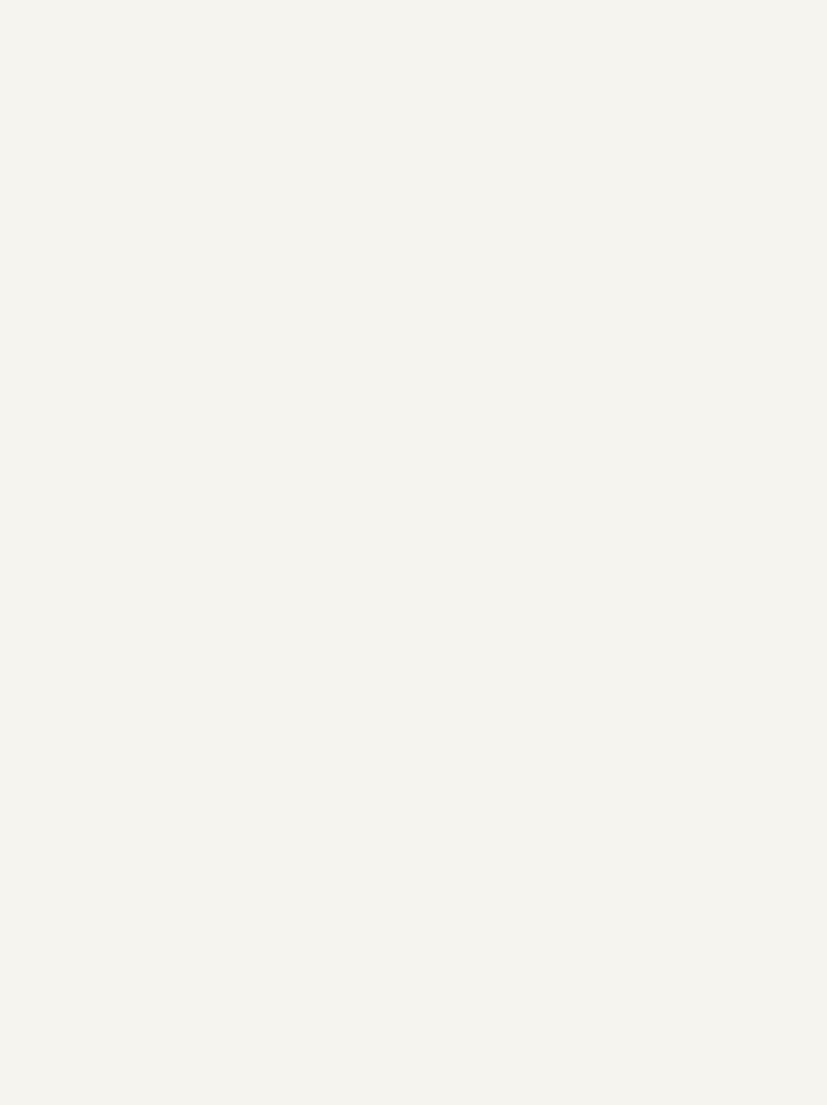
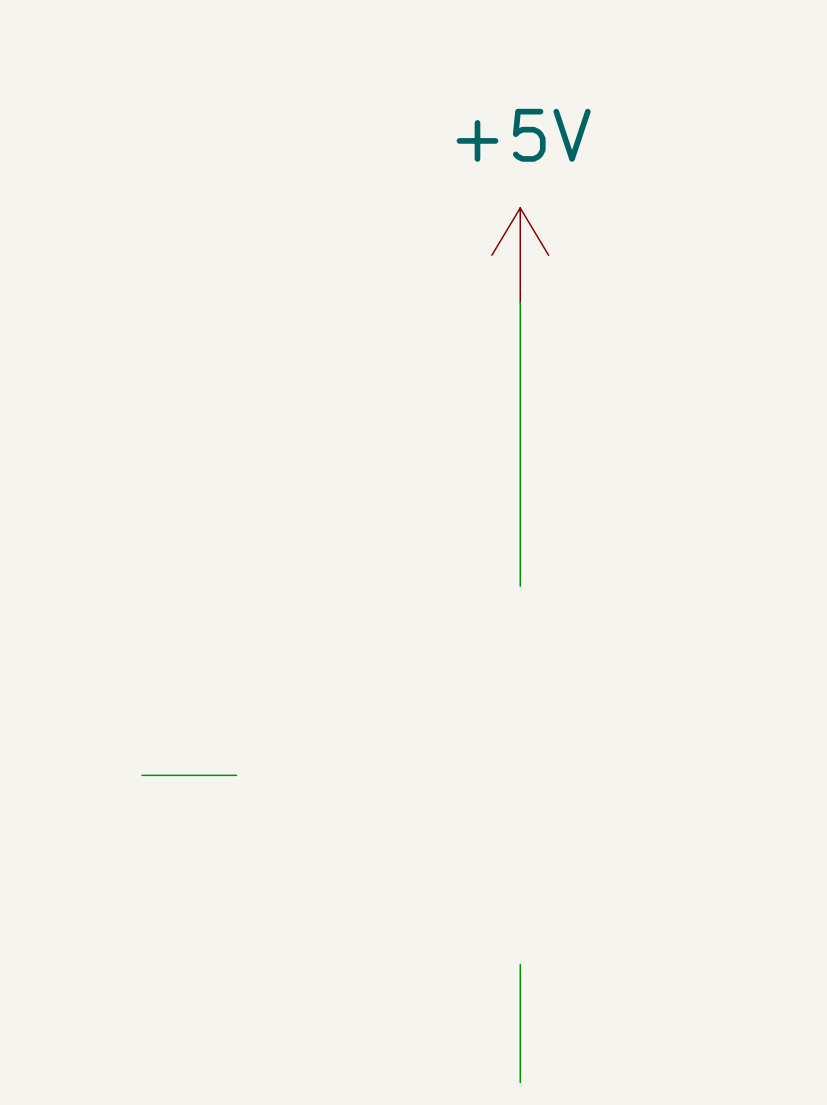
power symbol: none -> +5V (520, 255)
wire: none -> (520, 302) (520, 586)
wire: none -> (142, 775) (236, 775)
wire: none -> (520, 964) (520, 1082)

